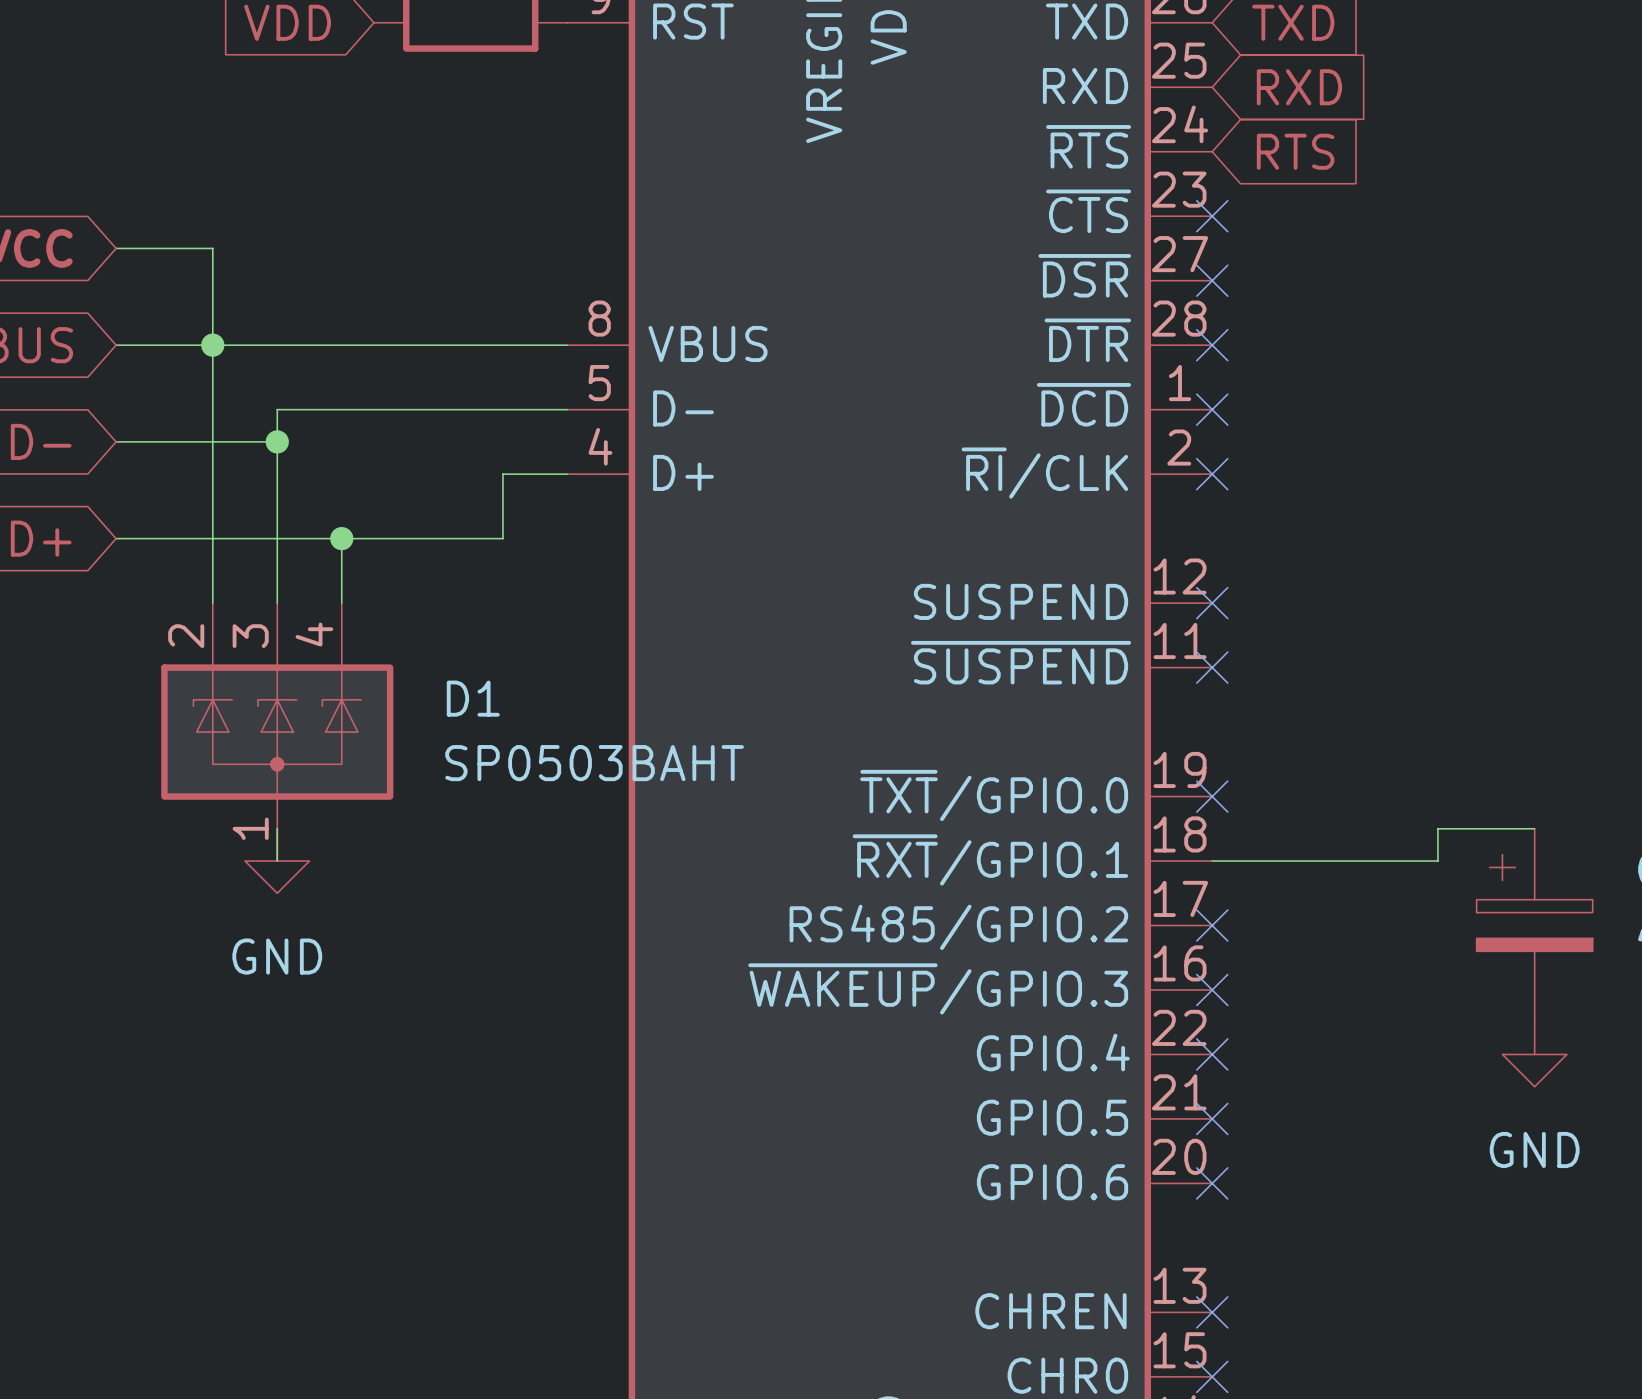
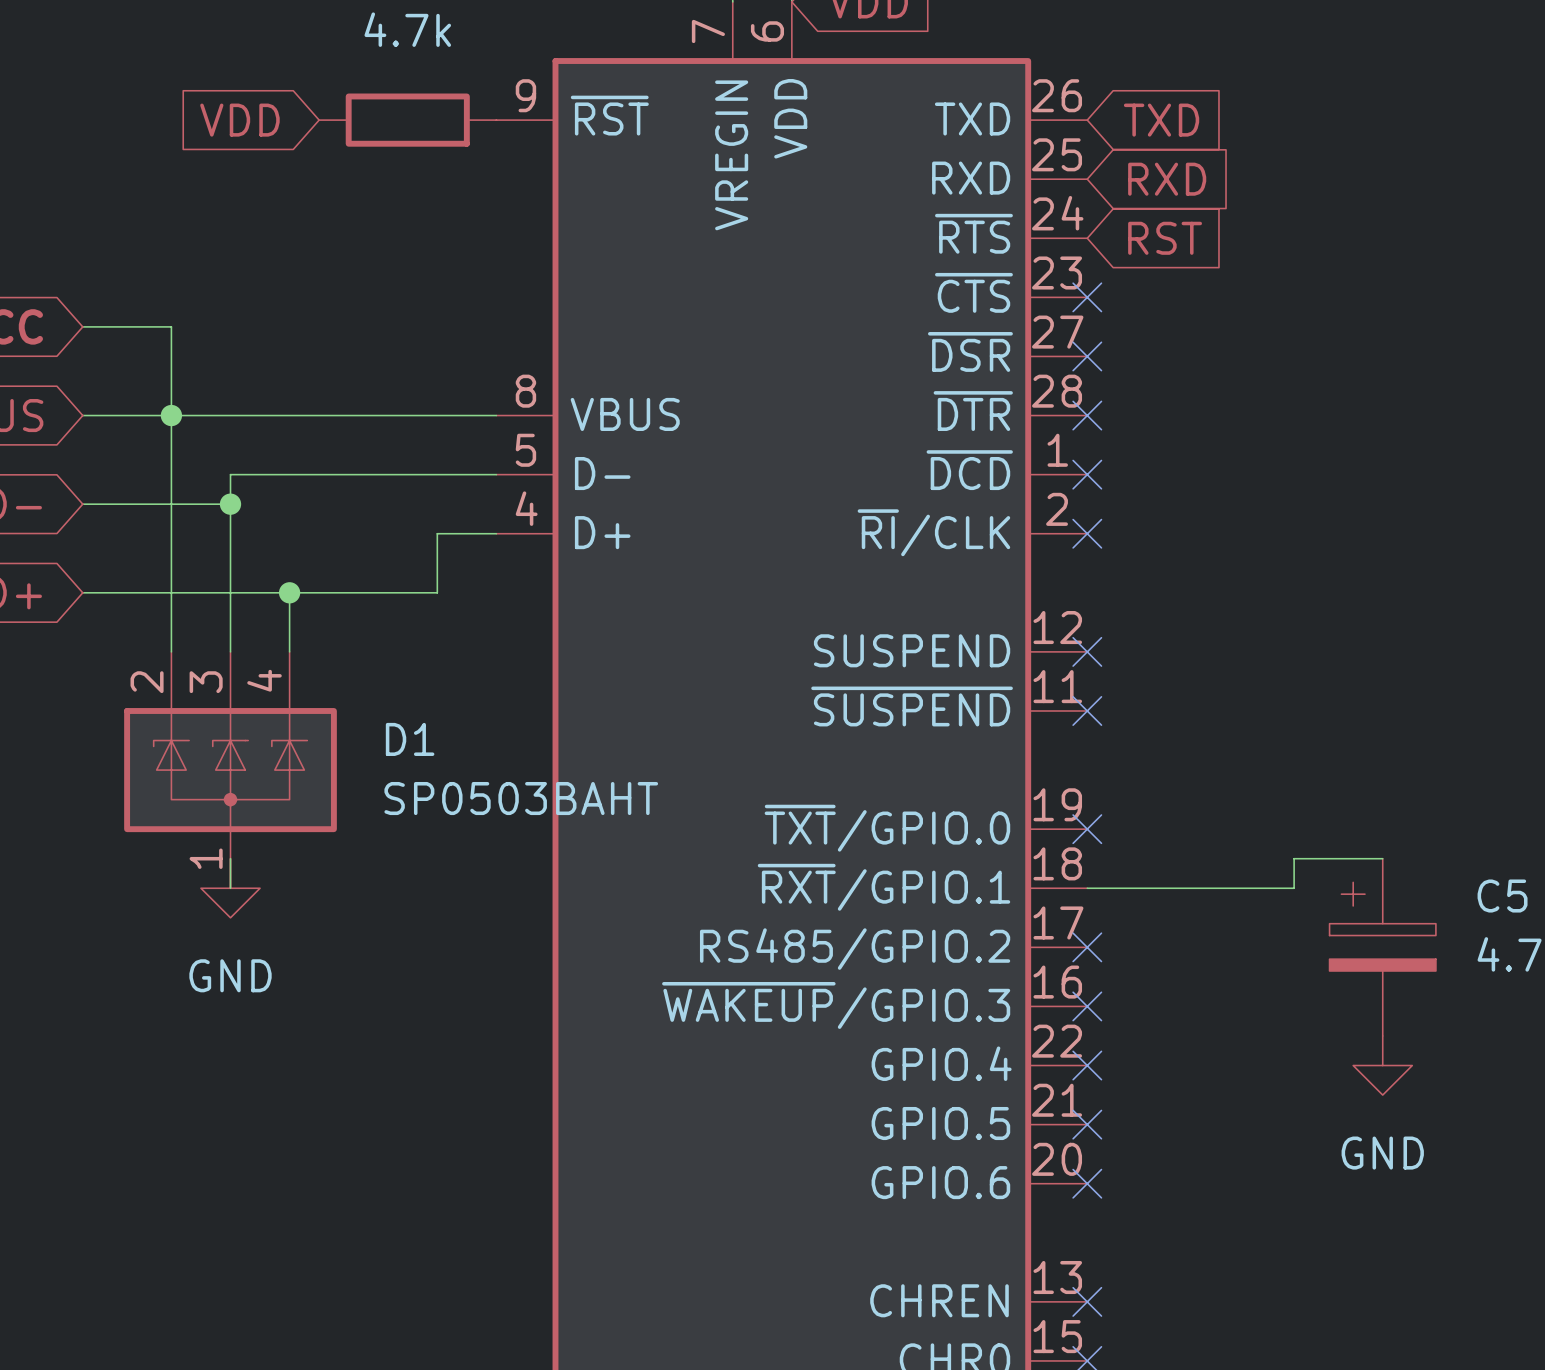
global label: RTS (1295, 151) -> RST (1165, 238)

